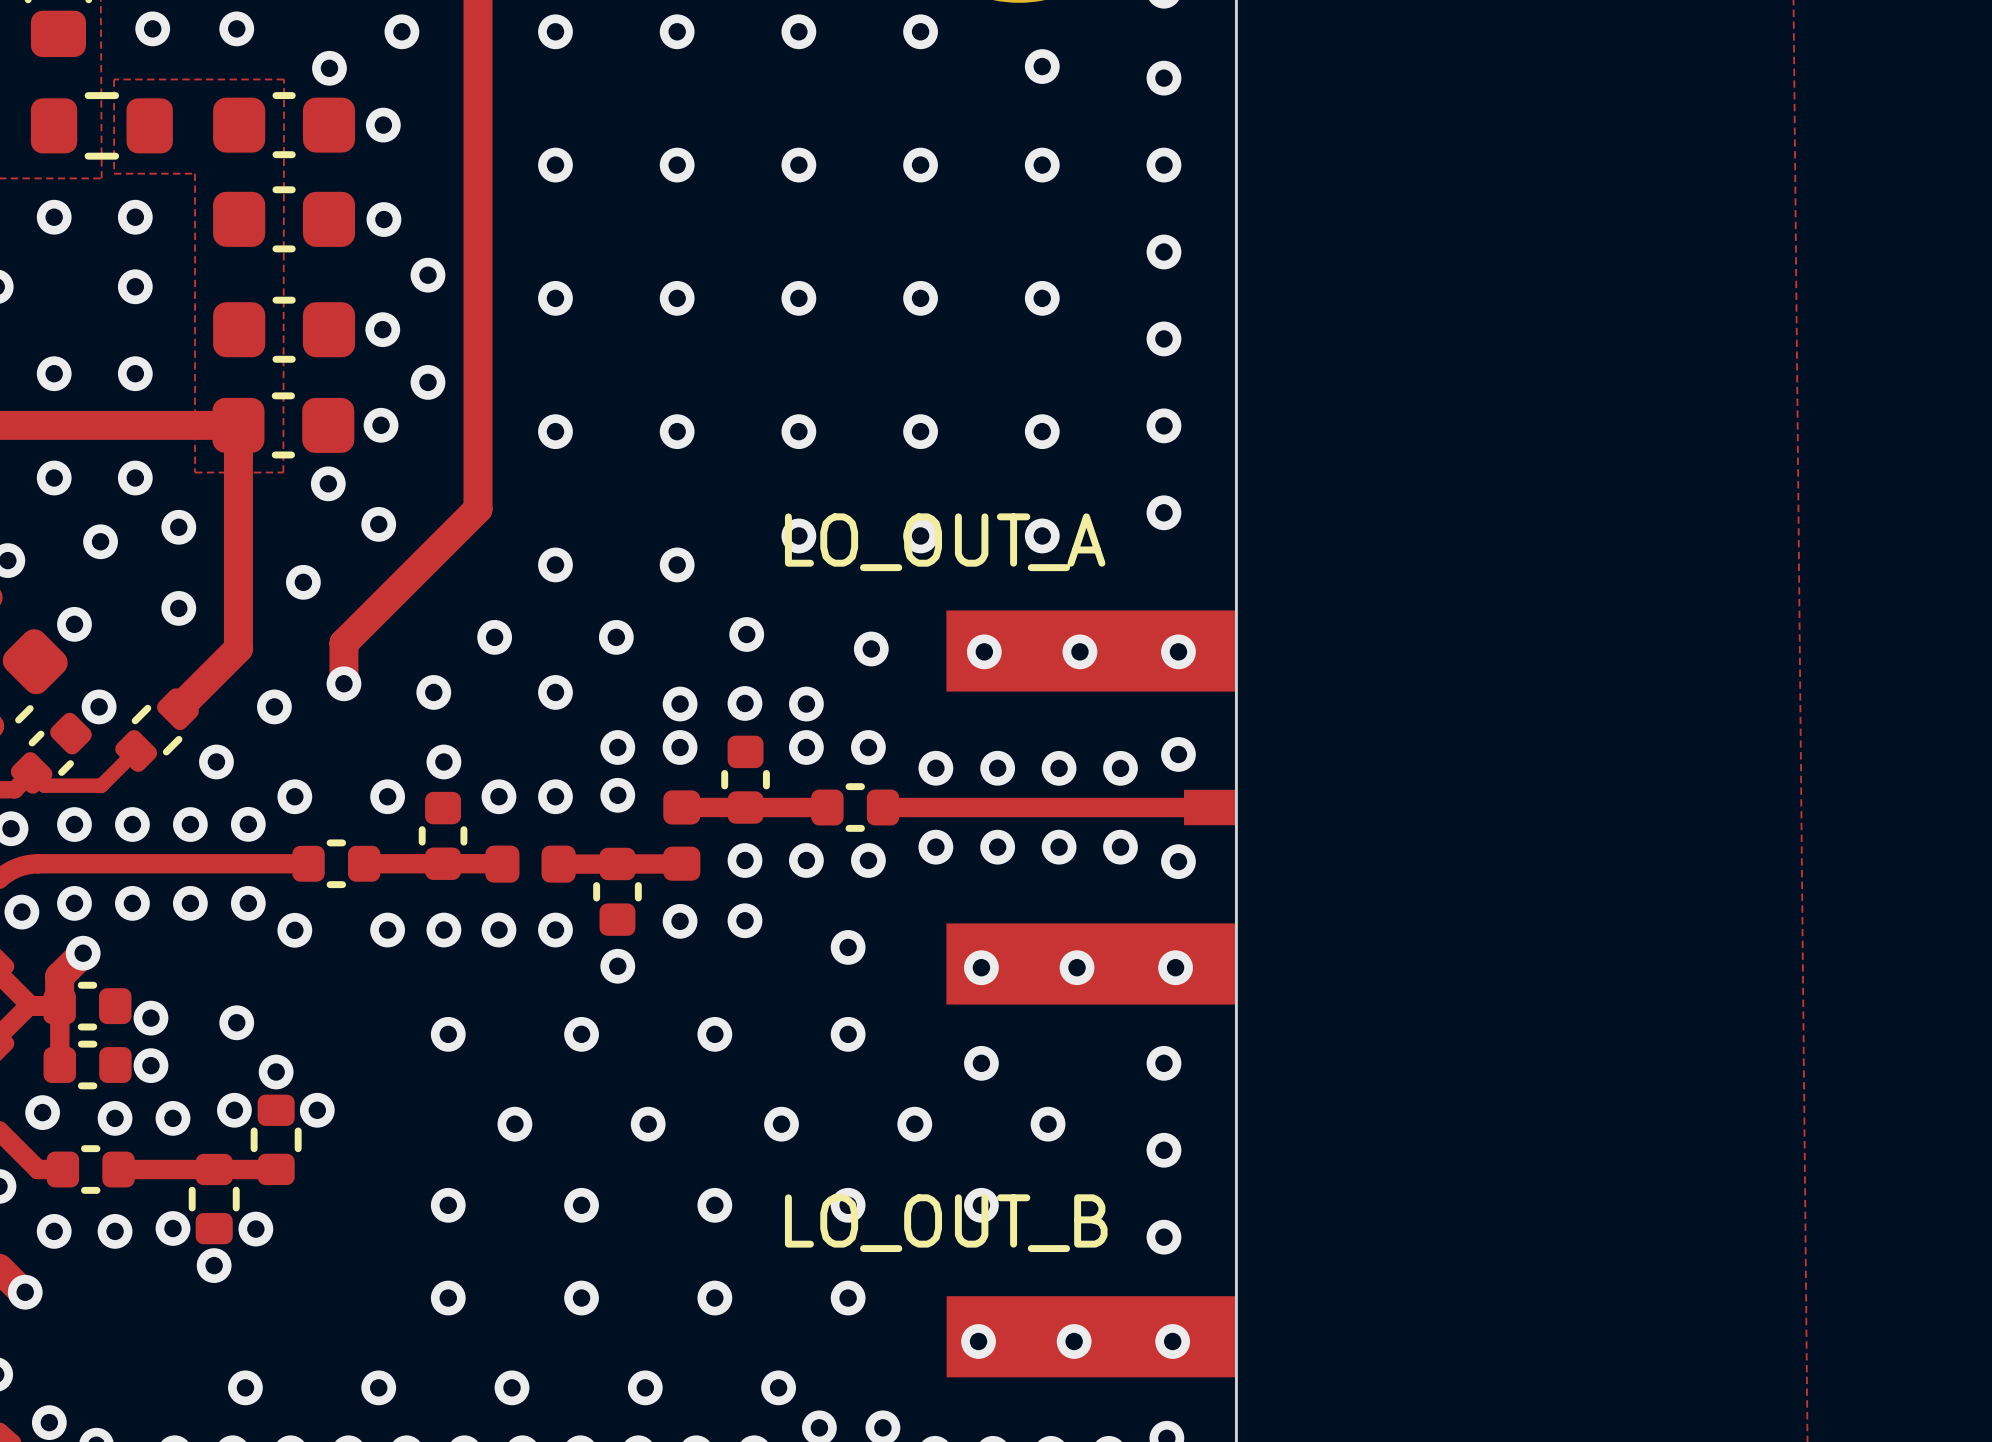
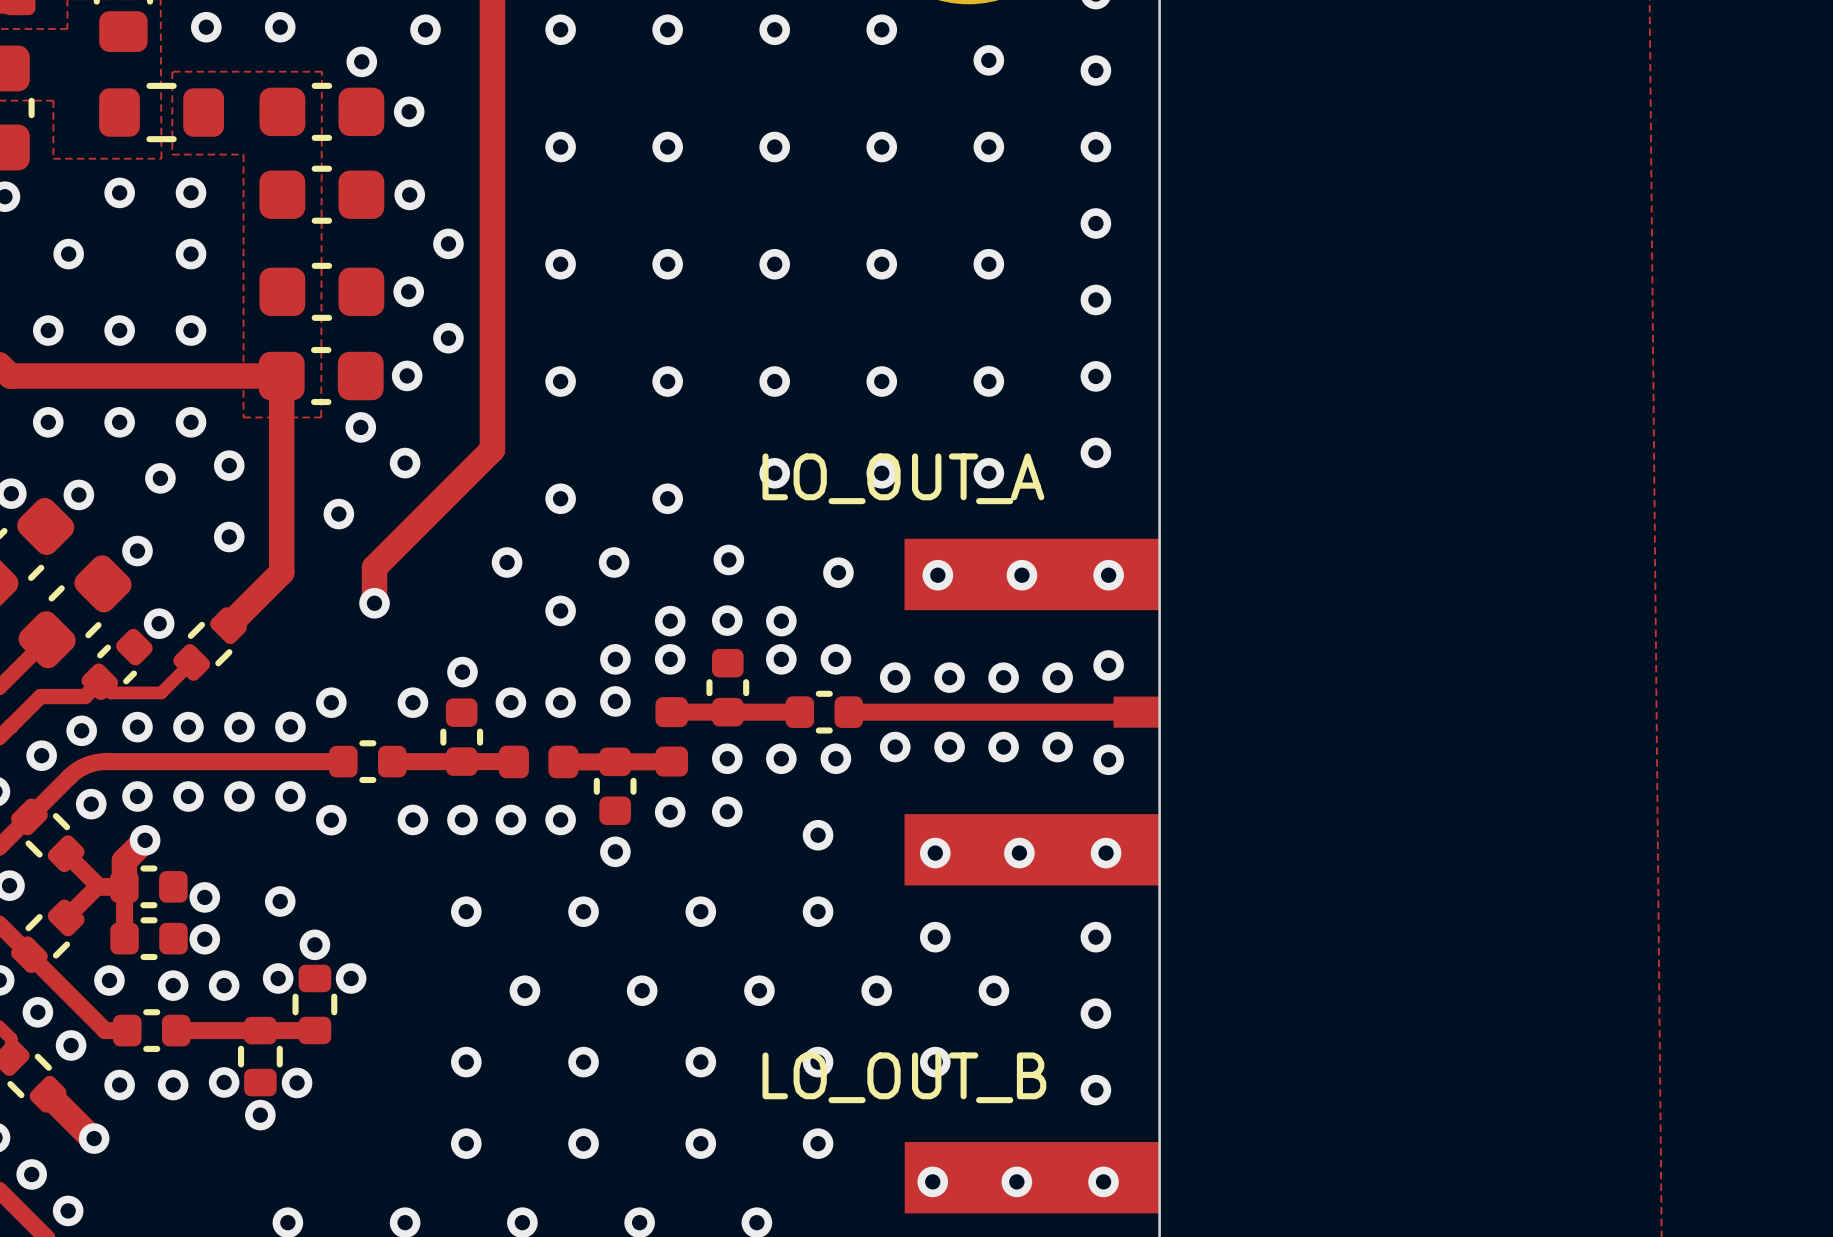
via: (433, 692) -> none
via: (274, 706) -> none
via: (216, 761) -> none

